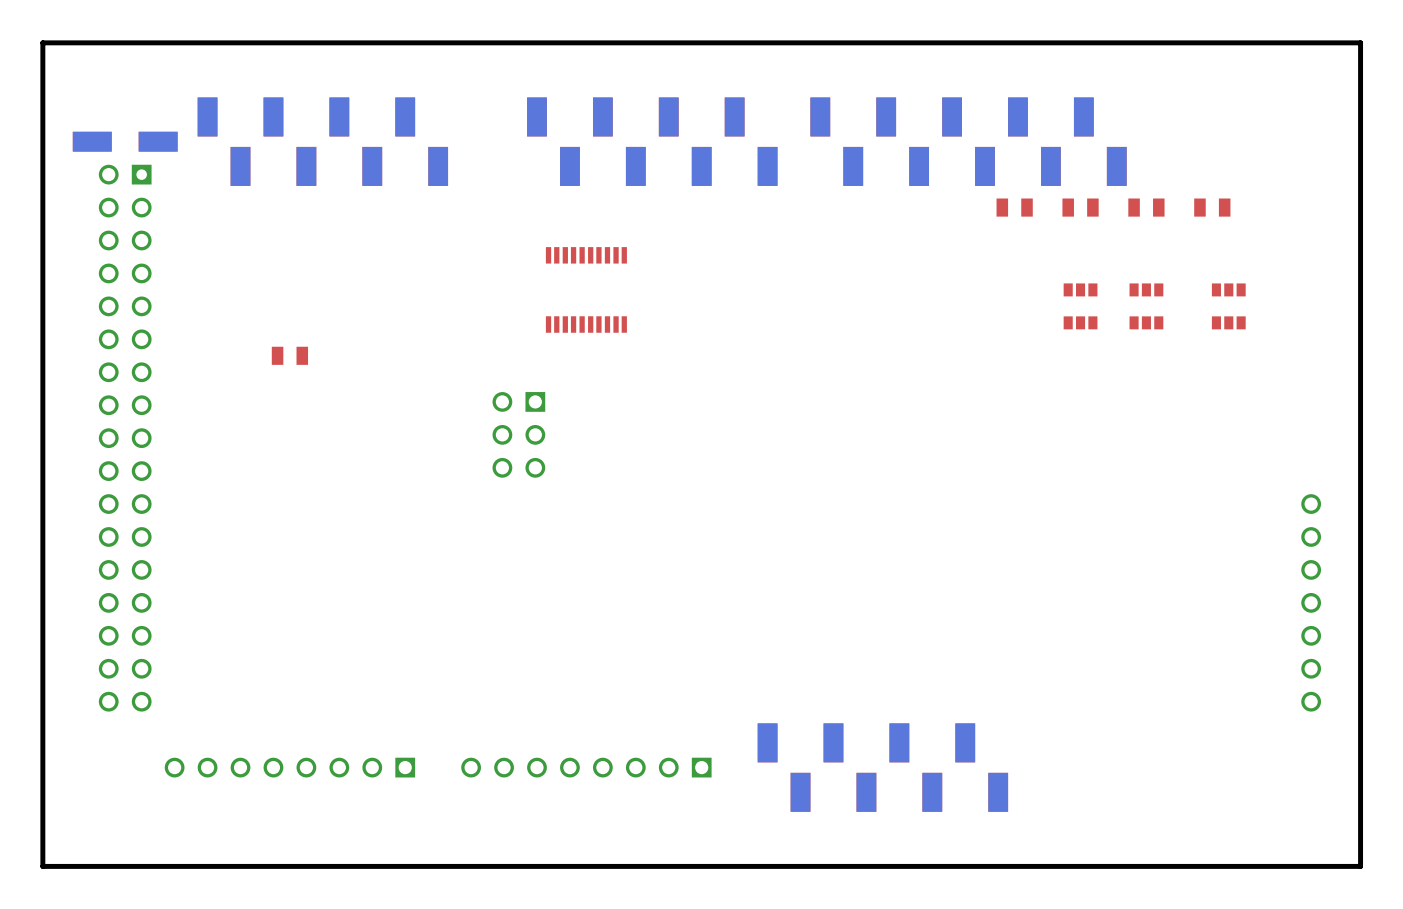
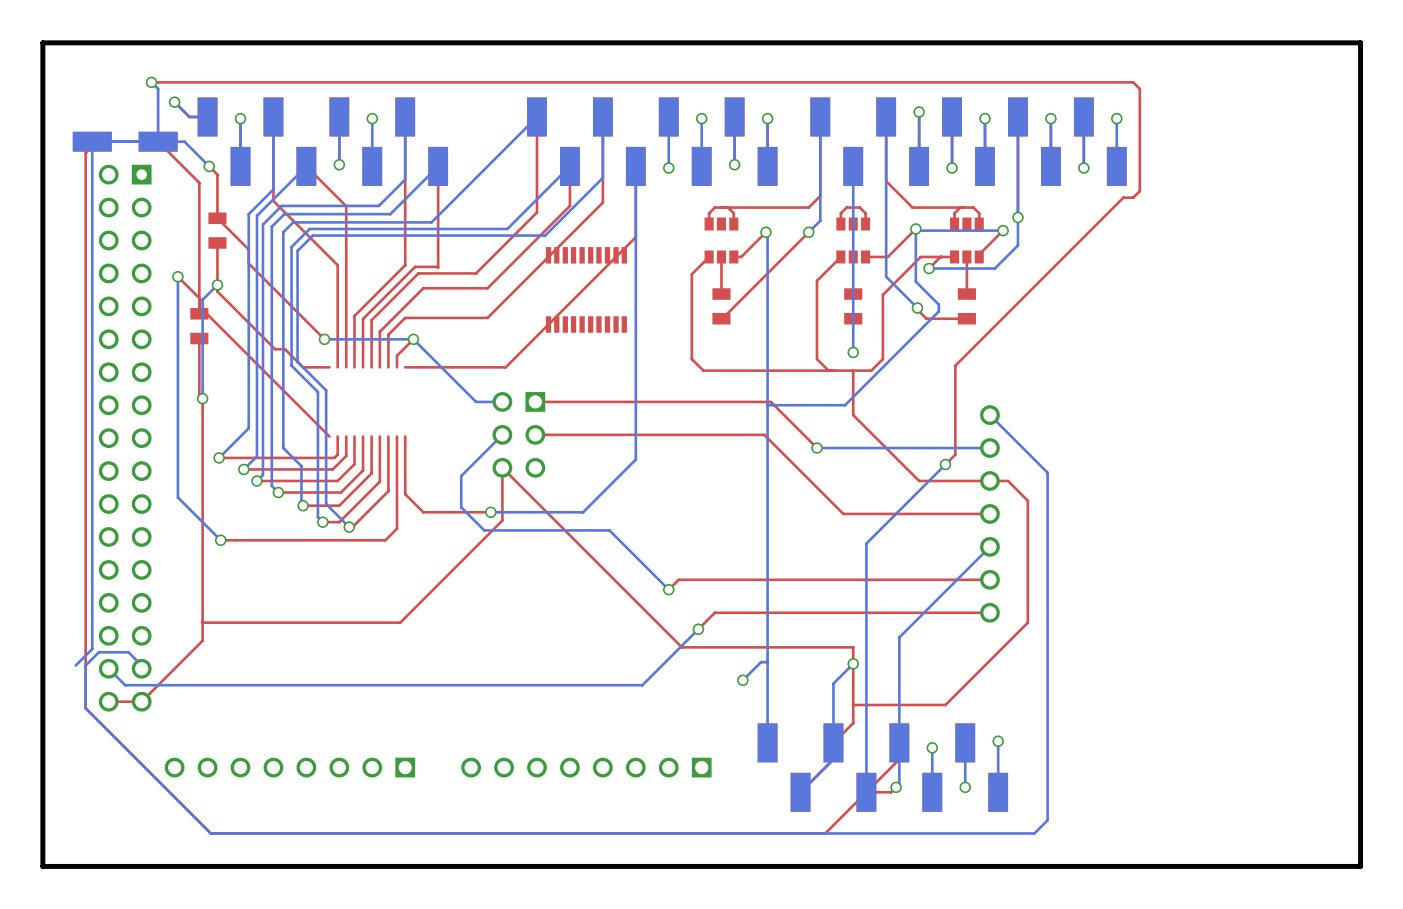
top track: none -> (151, 82) (1133, 82) (1139, 88) (1139, 191) (1133, 197) (1123, 197) (955, 365) (955, 454) (945, 464)
bottom track: none -> (151, 82) (158, 88) (158, 141)
via: none -> (151, 82)
bottom track: none -> (174, 102) (189, 116) (207, 116)
via: none -> (174, 102)
bottom track: none -> (919, 112) (919, 166)
via: none -> (919, 112)
bottom track: none -> (1050, 115) (1050, 166)
top track: none -> (273, 116) (273, 200) (337, 265) (337, 367)
bottom track: none -> (273, 116) (273, 189) (248, 214) (248, 428) (219, 457)
bottom track: none -> (339, 116) (339, 164)
top track: none -> (405, 116) (405, 265) (354, 315) (354, 367)
bottom track: none -> (405, 116) (405, 179) (378, 205) (281, 205) (262, 224) (262, 474) (256, 480)
top track: none -> (536, 116) (536, 212) (476, 273) (418, 273) (371, 320) (371, 367)
bottom track: none -> (536, 116) (431, 222) (293, 222) (283, 232) (283, 448) (301, 466) (301, 504) (303, 505)
top track: none -> (602, 116) (602, 202) (487, 317) (405, 317) (388, 334) (388, 367)
bottom track: none -> (602, 116) (602, 177) (545, 235) (312, 235) (297, 250) (297, 361) (326, 390) (326, 504) (349, 527)
bottom track: none -> (668, 116) (668, 168)
bottom track: none -> (734, 116) (734, 164)
top track: none -> (820, 116) (820, 196) (808, 207) (714, 207) (709, 213) (709, 224)
bottom track: none -> (820, 116) (820, 220) (808, 232)
top track: none -> (886, 116) (886, 181) (912, 207) (973, 207) (979, 213) (979, 224)
bottom track: none -> (886, 116) (886, 276) (917, 308)
bottom track: none -> (952, 116) (952, 168)
bottom track: none -> (1017, 116) (1017, 245) (994, 268) (929, 268)
bottom track: none -> (1083, 116) (1083, 168)
bottom track: none -> (240, 118) (240, 166)
via: none -> (240, 118)
bottom track: none -> (372, 118) (372, 166)
via: none -> (372, 118)
bottom track: none -> (701, 118) (701, 166)
via: none -> (701, 118)
bottom track: none -> (767, 118) (767, 166)
via: none -> (767, 118)
bottom track: none -> (985, 118) (985, 166)
via: none -> (985, 118)
via: none -> (1050, 118)
bottom track: none -> (1116, 118) (1116, 166)
via: none -> (1116, 118)
via: none -> (339, 164)
via: none -> (734, 164)
top track: none -> (209, 166) (217, 174) (217, 218) (248, 249) (248, 263) (324, 339)
bottom track: none -> (209, 166) (184, 141) (92, 141) (92, 648) (75, 665)
via: none -> (209, 166)
top track: none -> (306, 166) (346, 206) (346, 367)
bottom track: none -> (306, 166) (256, 215) (256, 456) (243, 469)
top track: none -> (438, 166) (438, 267) (415, 266) (363, 318) (363, 367)
bottom track: none -> (438, 166) (390, 214) (284, 214) (271, 226) (271, 485) (278, 492)
top track: none -> (569, 166) (569, 205) (487, 288) (423, 288) (379, 331) (379, 367)
bottom track: none -> (569, 166) (507, 228) (309, 228) (291, 247) (291, 365) (317, 392) (317, 517) (322, 522)
top track: none -> (635, 166) (635, 237) (505, 367) (405, 367)
bottom track: none -> (635, 166) (635, 459) (583, 512) (490, 512)
bottom track: none -> (853, 166) (853, 352)
via: none -> (668, 168)
via: none -> (952, 168)
via: none -> (1083, 168)
top track: none -> (728, 207) (733, 213) (733, 224)
top track: none -> (960, 207) (954, 213) (954, 224)
part: (1014, 207) -> none
part: (1080, 207) -> none
part: (1146, 207) -> none
part: (1212, 207) -> none
via: none -> (1017, 217)
top track: none -> (865, 224) (865, 213) (859, 207) (846, 207) (840, 213) (840, 224)
top track: none -> (915, 228) (887, 256) (865, 256)
via: none -> (915, 228)
part: none -> (217, 230)
top track: none -> (1003, 230) (979, 254) (979, 256)
bottom track: none -> (1003, 230) (917, 230) (915, 228) (915, 281) (938, 304) (938, 311) (845, 405) (767, 405)
via: none -> (1003, 230)
top track: none -> (765, 232) (741, 256) (733, 256)
bottom track: none -> (765, 232) (767, 233) (767, 742)
via: none -> (765, 232)
top track: none -> (808, 232) (721, 318)
via: none -> (808, 232)
part: none -> (721, 240)
part: none -> (853, 240)
part: none -> (966, 240)
top track: none -> (217, 242) (217, 291) (275, 349) (284, 349) (303, 367) (329, 367)
top track: none -> (721, 256) (721, 294)
top track: none -> (840, 256) (817, 280) (817, 359) (828, 370)
top track: none -> (940, 256) (929, 268)
top track: none -> (954, 256) (920, 256) (882, 294) (882, 359) (871, 370) (703, 370) (691, 359) (691, 274) (709, 256)
top track: none -> (966, 256) (966, 294)
via: none -> (929, 268)
top track: none -> (177, 276) (199, 298)
bottom track: none -> (177, 276) (177, 497) (220, 540)
via: none -> (177, 276)
bottom track: none -> (217, 284) (202, 299) (202, 398)
via: none -> (217, 284)
part: none -> (721, 306)
part: none -> (853, 306)
part: none -> (966, 306)
part: (1080, 306) -> none
part: (1146, 306) -> none
part: (1228, 306) -> none
top track: none -> (917, 308) (926, 318) (966, 318)
via: none -> (917, 308)
part: none -> (199, 326)
top track: none -> (199, 338) (199, 395) (202, 398) (202, 640) (141, 701) (108, 701)
bottom track: none -> (324, 339) (413, 339) (476, 401) (502, 401)
via: none -> (324, 339)
top track: none -> (413, 339) (396, 355) (396, 367)
via: none -> (413, 339)
via: none -> (853, 352)
part: (289, 355) -> none
top track: none -> (853, 370) (853, 415) (919, 480) (1008, 480) (1027, 500) (1027, 622) (945, 705) (853, 705)
via: none -> (202, 398)
top track: none -> (535, 401) (770, 401) (817, 448)
bottom track: none -> (989, 415) (1047, 472) (1047, 820) (1034, 833) (210, 833) (85, 708) (85, 665) (98, 652) (128, 652) (141, 665) (141, 668)
bottom track: none -> (502, 434) (461, 476) (461, 507) (484, 530) (609, 530) (668, 589)
top track: none -> (535, 434) (764, 434) (843, 513) (989, 513)
top track: none -> (329, 436) (206, 313) (199, 313) (199, 182) (158, 141) (92, 141) (92, 146) (85, 153) (85, 708) (210, 833) (825, 833) (899, 759) (899, 742)
top track: none -> (337, 436) (337, 454) (334, 457) (219, 457)
top track: none -> (346, 436) (346, 455) (332, 469) (243, 469)
top track: none -> (354, 436) (354, 464) (337, 480) (256, 480)
top track: none -> (363, 436) (363, 470) (340, 492) (278, 492)
top track: none -> (371, 436) (371, 473) (339, 505) (303, 505)
top track: none -> (379, 436) (379, 481) (339, 522) (322, 522)
top track: none -> (388, 436) (388, 491) (352, 527) (349, 527)
top track: none -> (396, 436) (396, 528) (385, 540) (220, 540)
top track: none -> (405, 436) (405, 494) (423, 512) (490, 512)
via: none -> (817, 448)
bottom track: none -> (989, 448) (817, 448)
via: none -> (219, 457)
bottom track: none -> (945, 464) (866, 543) (866, 792)
via: none -> (945, 464)
via: none -> (243, 469)
via: none -> (256, 480)
via: none -> (278, 492)
via: none -> (303, 505)
via: none -> (490, 512)
part: none -> (989, 513)
via: none -> (322, 522)
via: none -> (349, 527)
via: none -> (220, 540)
bottom track: none -> (989, 546) (899, 637) (899, 784) (896, 787)
top track: none -> (989, 579) (678, 579) (668, 589)
via: none -> (668, 589)
part: (1311, 602) -> none
top track: none -> (989, 612) (714, 612) (698, 629)
top track: none -> (202, 622) (400, 622) (502, 520) (502, 467) (681, 647) (853, 647) (853, 723) (833, 742) (833, 759) (800, 792)
bottom track: none -> (698, 629) (642, 685) (125, 685) (108, 668)
via: none -> (698, 629)
bottom track: none -> (767, 662) (761, 662) (742, 680)
bottom track: none -> (853, 663) (833, 683) (833, 759) (800, 792)
via: none -> (853, 663)
via: none -> (742, 680)
bottom track: none -> (998, 741) (998, 792)
via: none -> (998, 741)
bottom track: none -> (965, 742) (965, 787)
bottom track: none -> (932, 747) (932, 792)
via: none -> (932, 747)
top track: none -> (896, 787) (891, 792) (866, 792)
via: none -> (896, 787)
via: none -> (965, 787)

